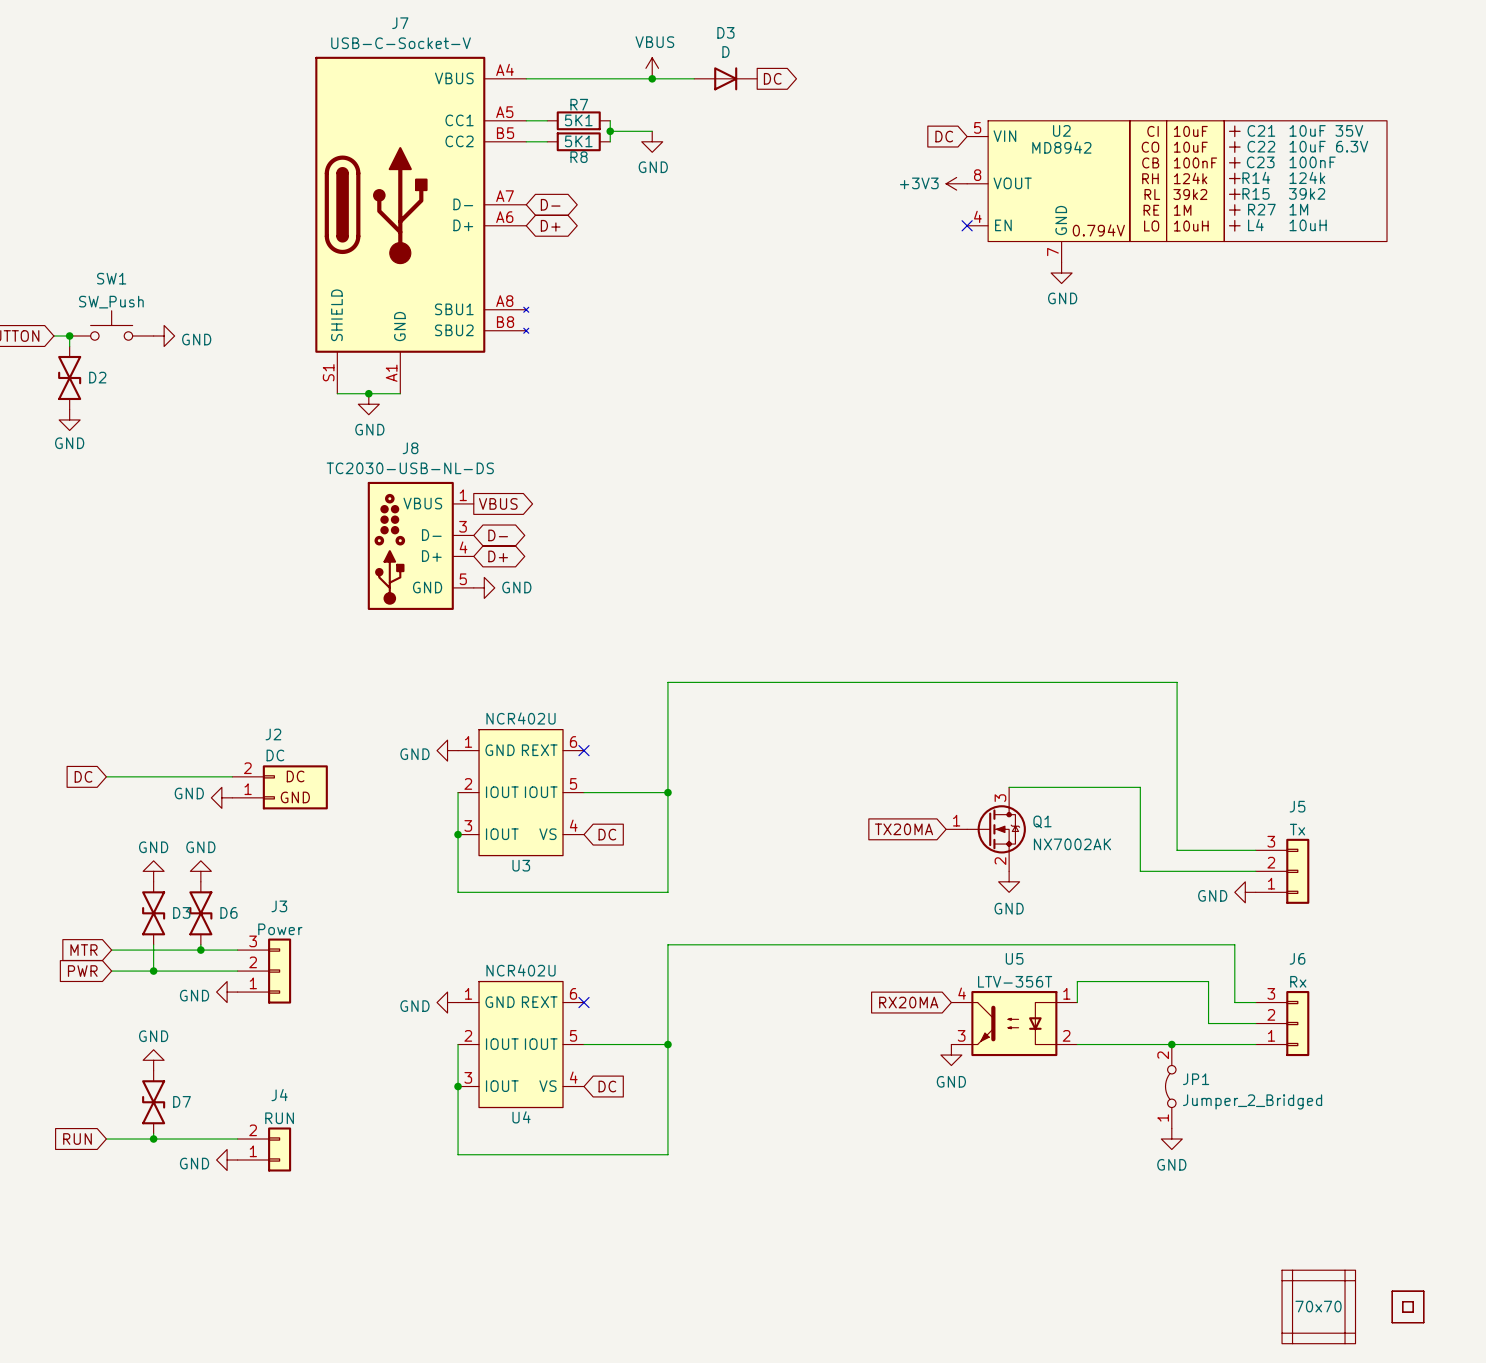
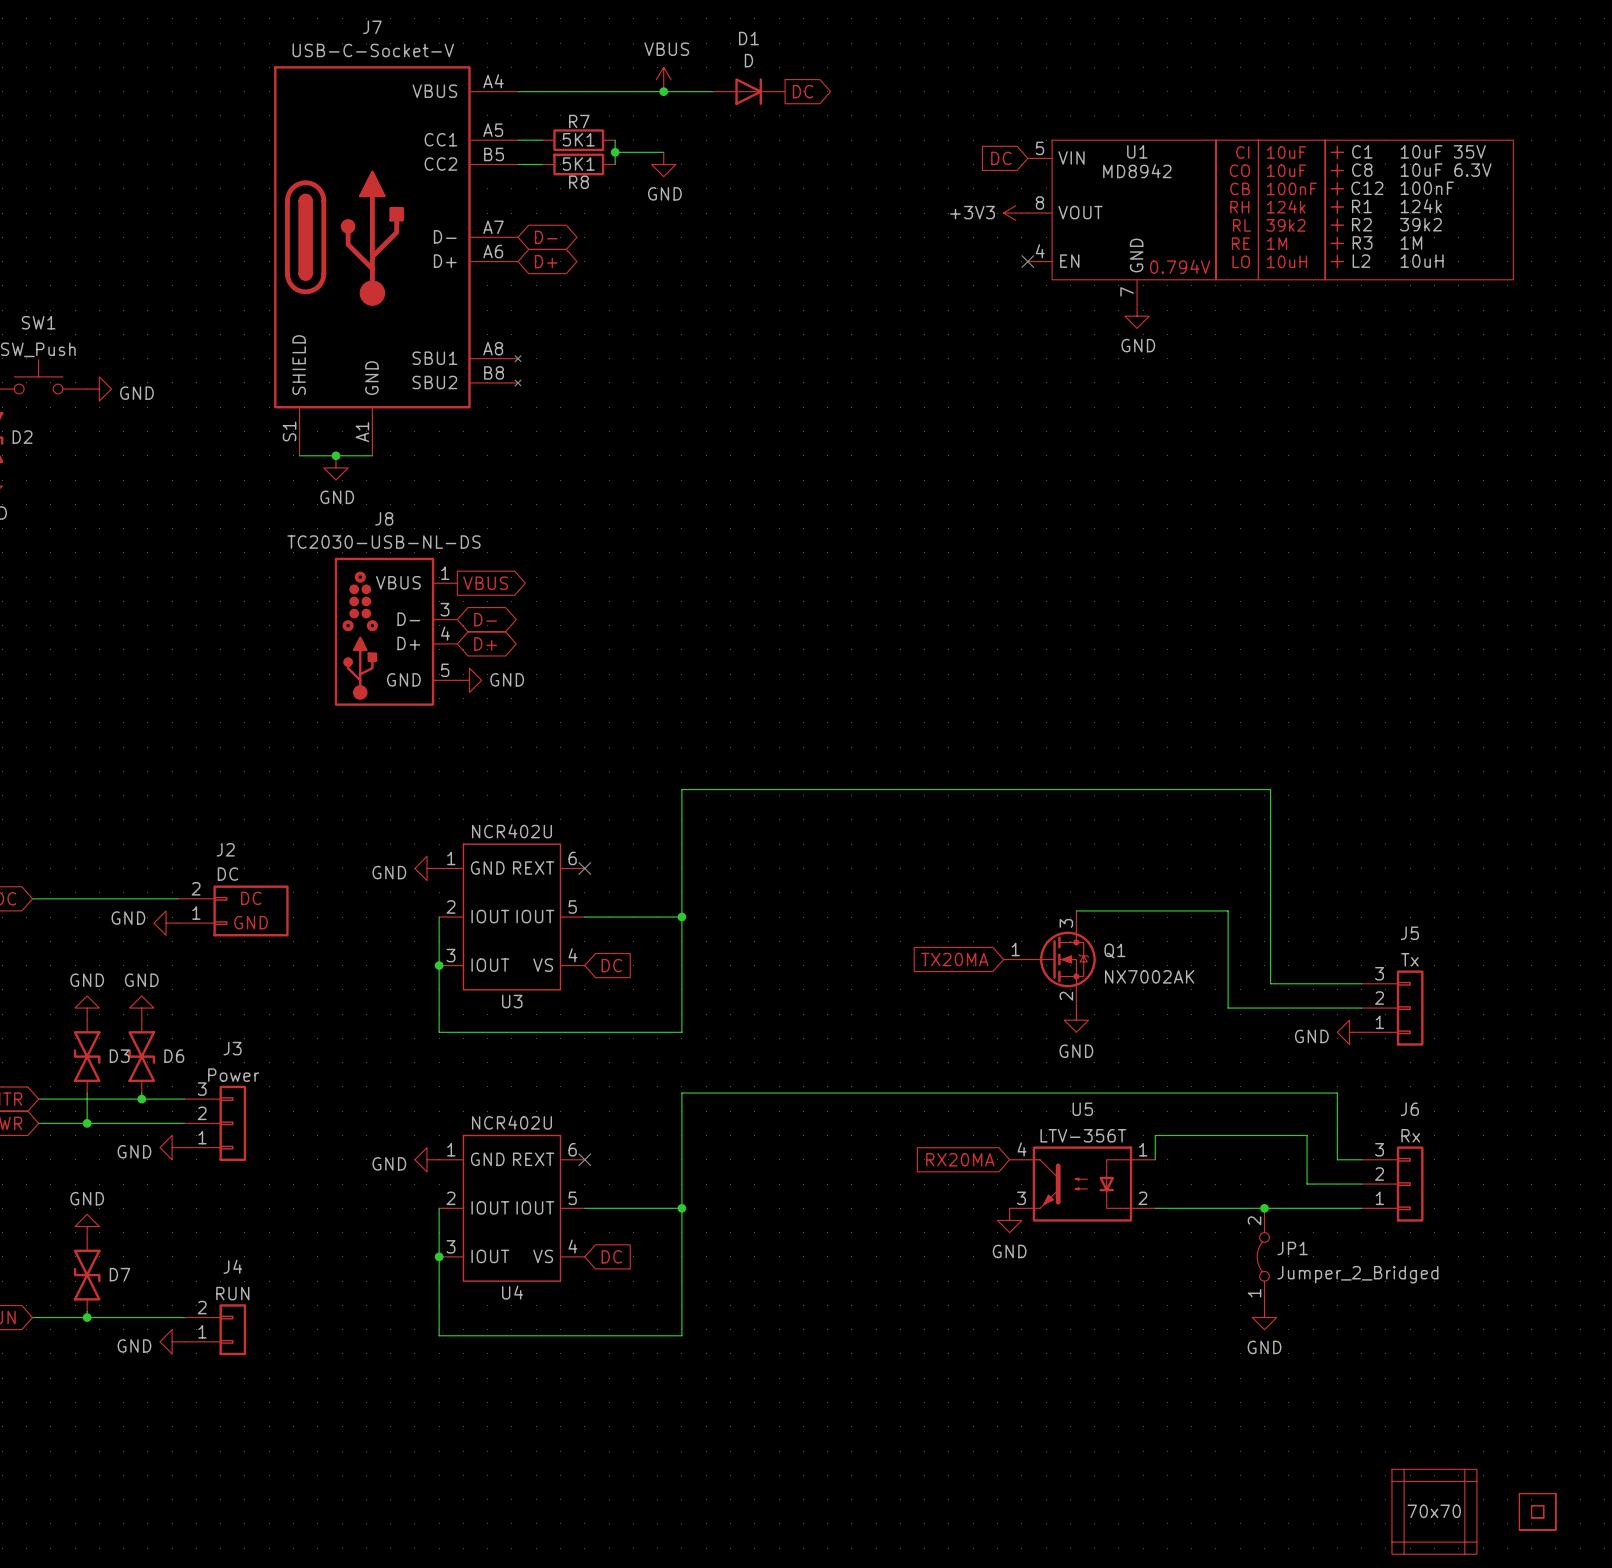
D3 name: D3 (725, 32) -> D1 (748, 38)
U2 name: U2 (1061, 130) -> U1 (1137, 151)
C21 name: C21 (1261, 130) -> C1 (1362, 151)
C22 name: C22 (1261, 146) -> C8 (1362, 170)
C23 name: C23 (1260, 162) -> C12 (1367, 188)
R14 name: R14 (1256, 177) -> R1 (1361, 206)
R15 name: R15 (1256, 193) -> R2 (1361, 224)
R27 name: R27 (1261, 209) -> R3 (1362, 242)
L4 name: L4 (1255, 225) -> L2 (1361, 261)

